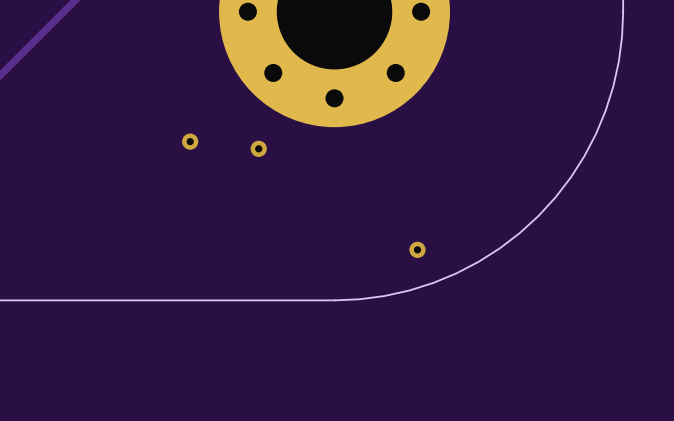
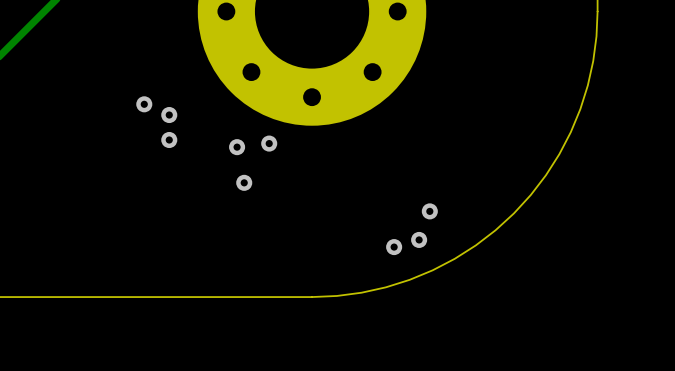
via: none -> (144, 104)
via: none -> (169, 115)
via: none -> (269, 143)
via: none -> (244, 182)
via: none -> (429, 211)
via: none -> (419, 239)

